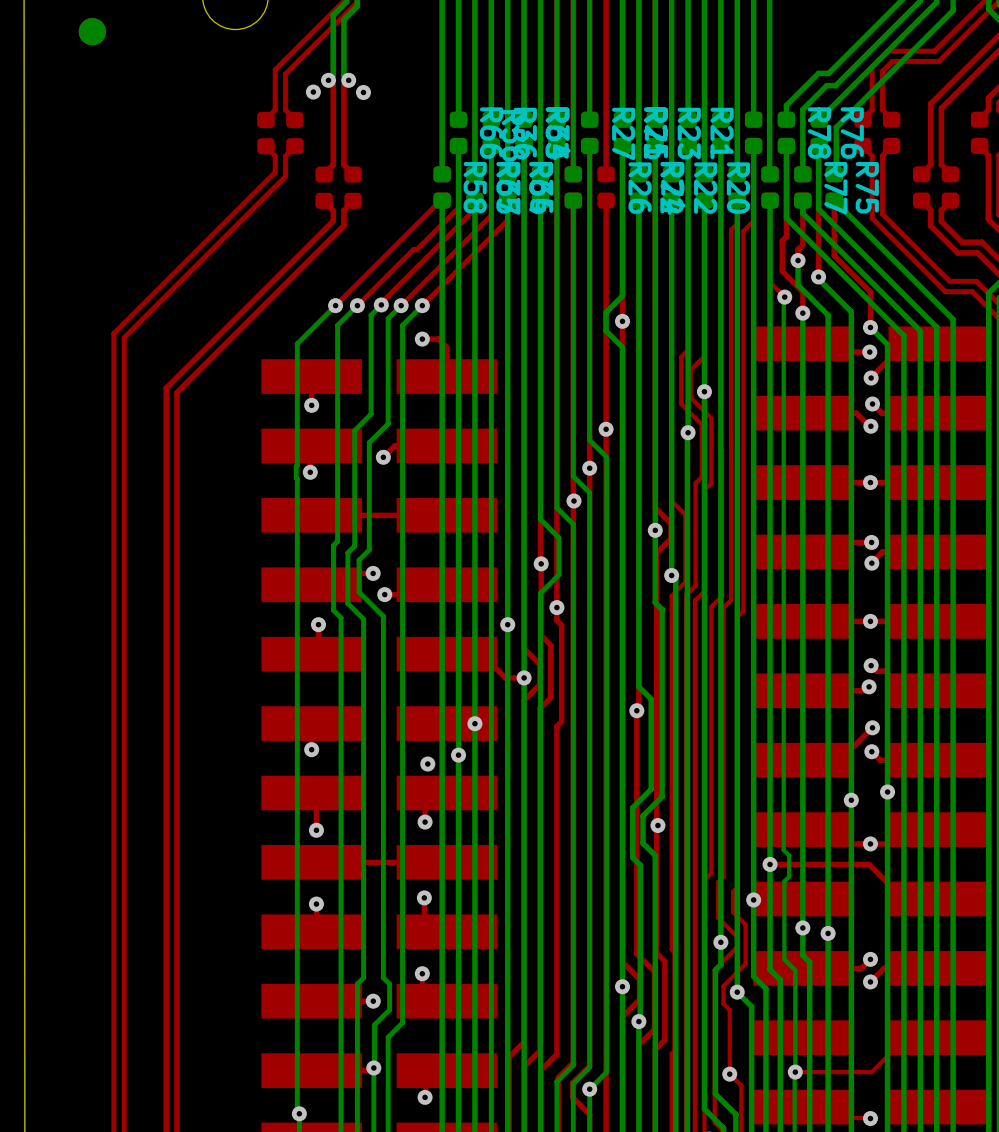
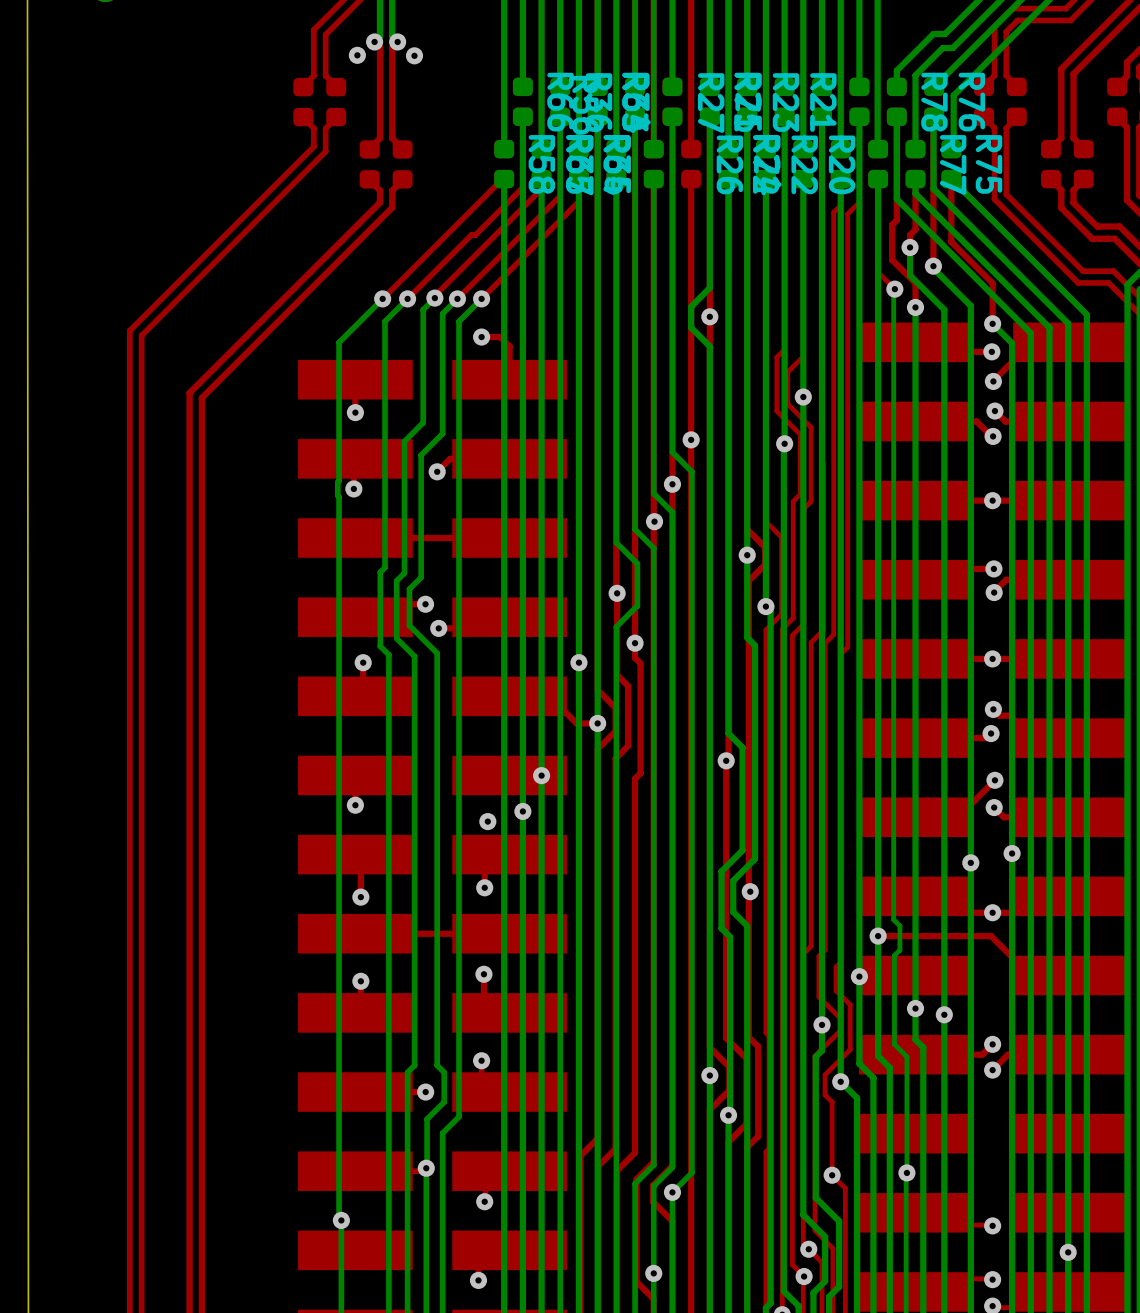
top track: (938, 1037) (906, 1037) (871, 1072) (795, 1072) -> none

